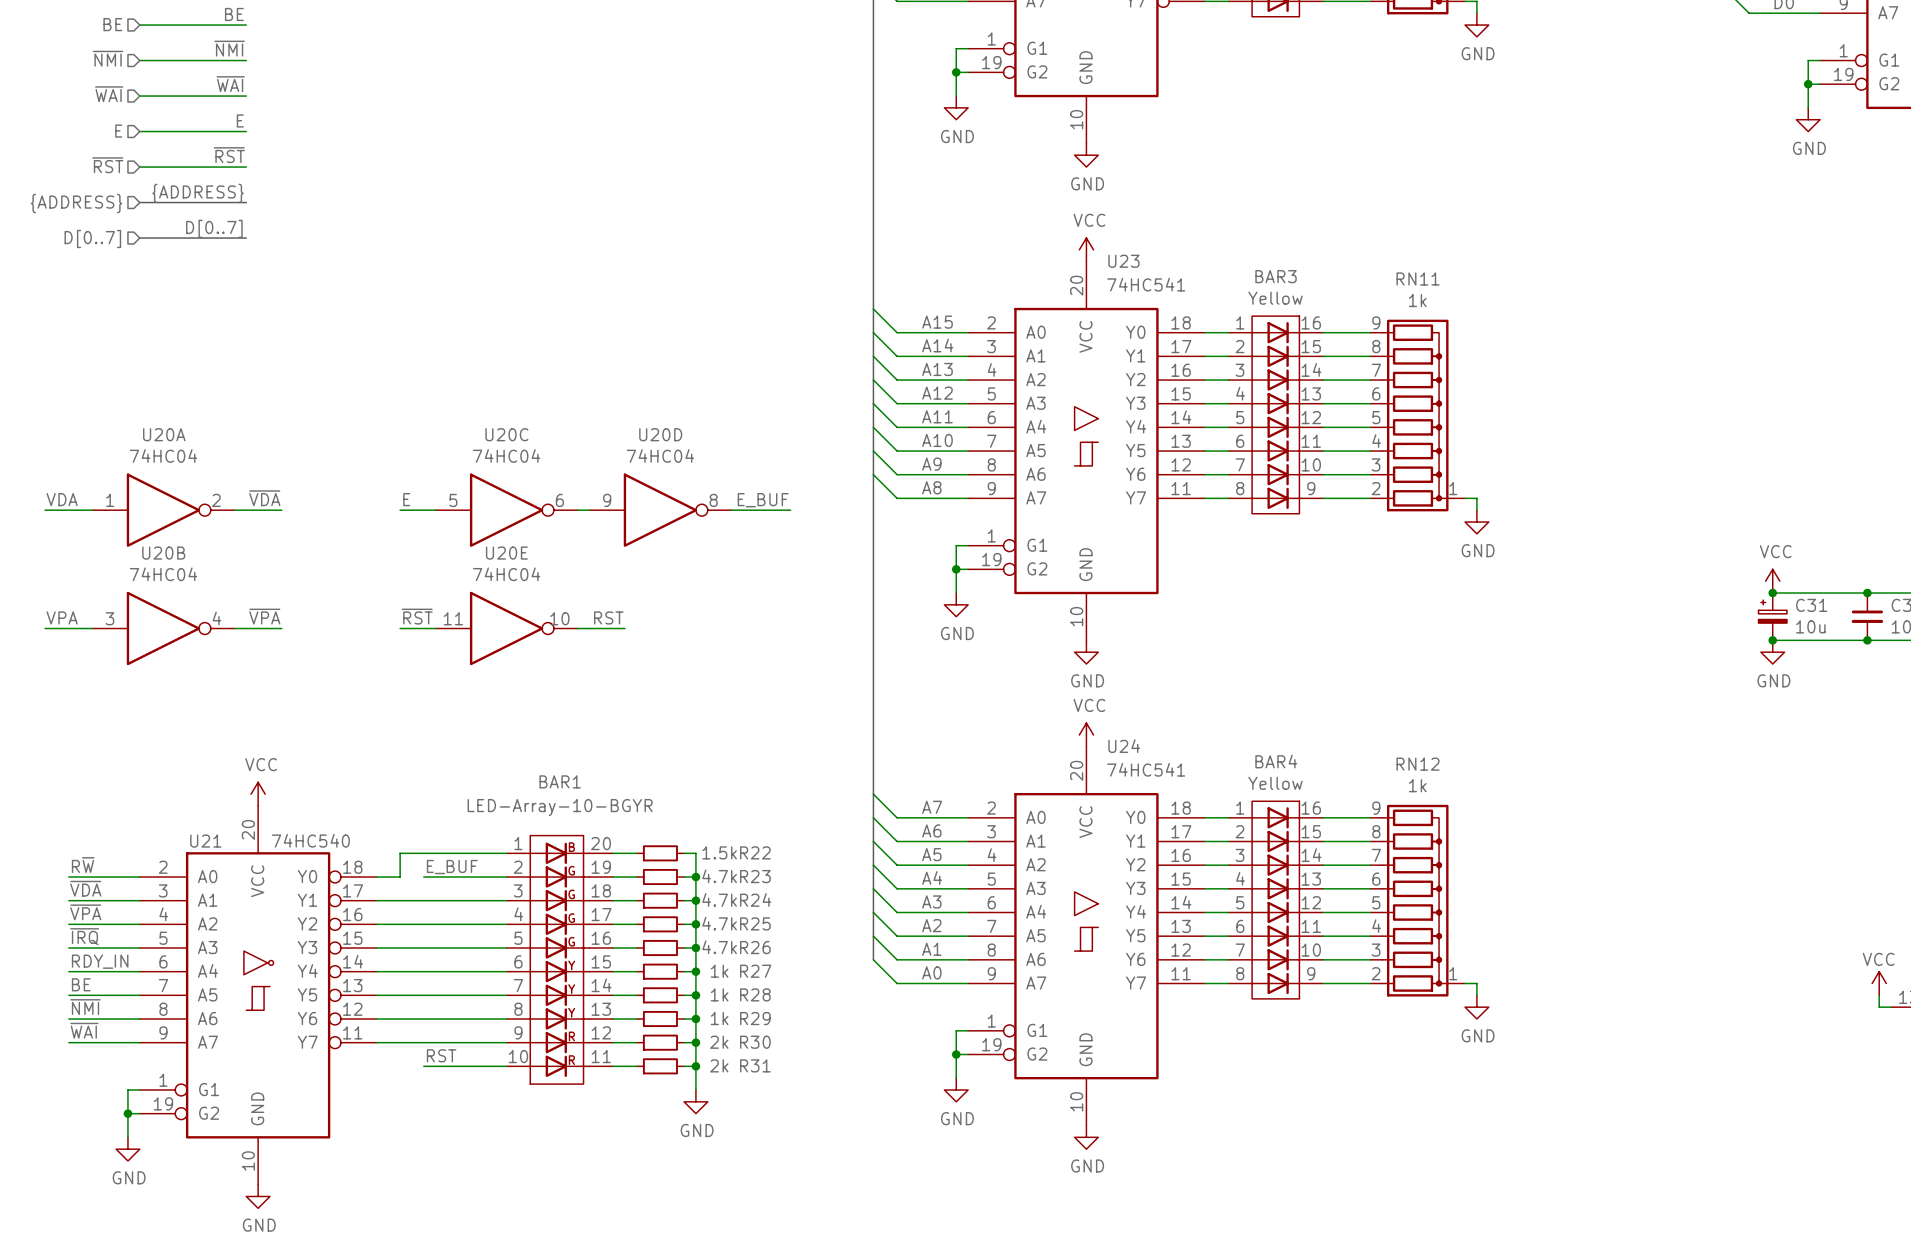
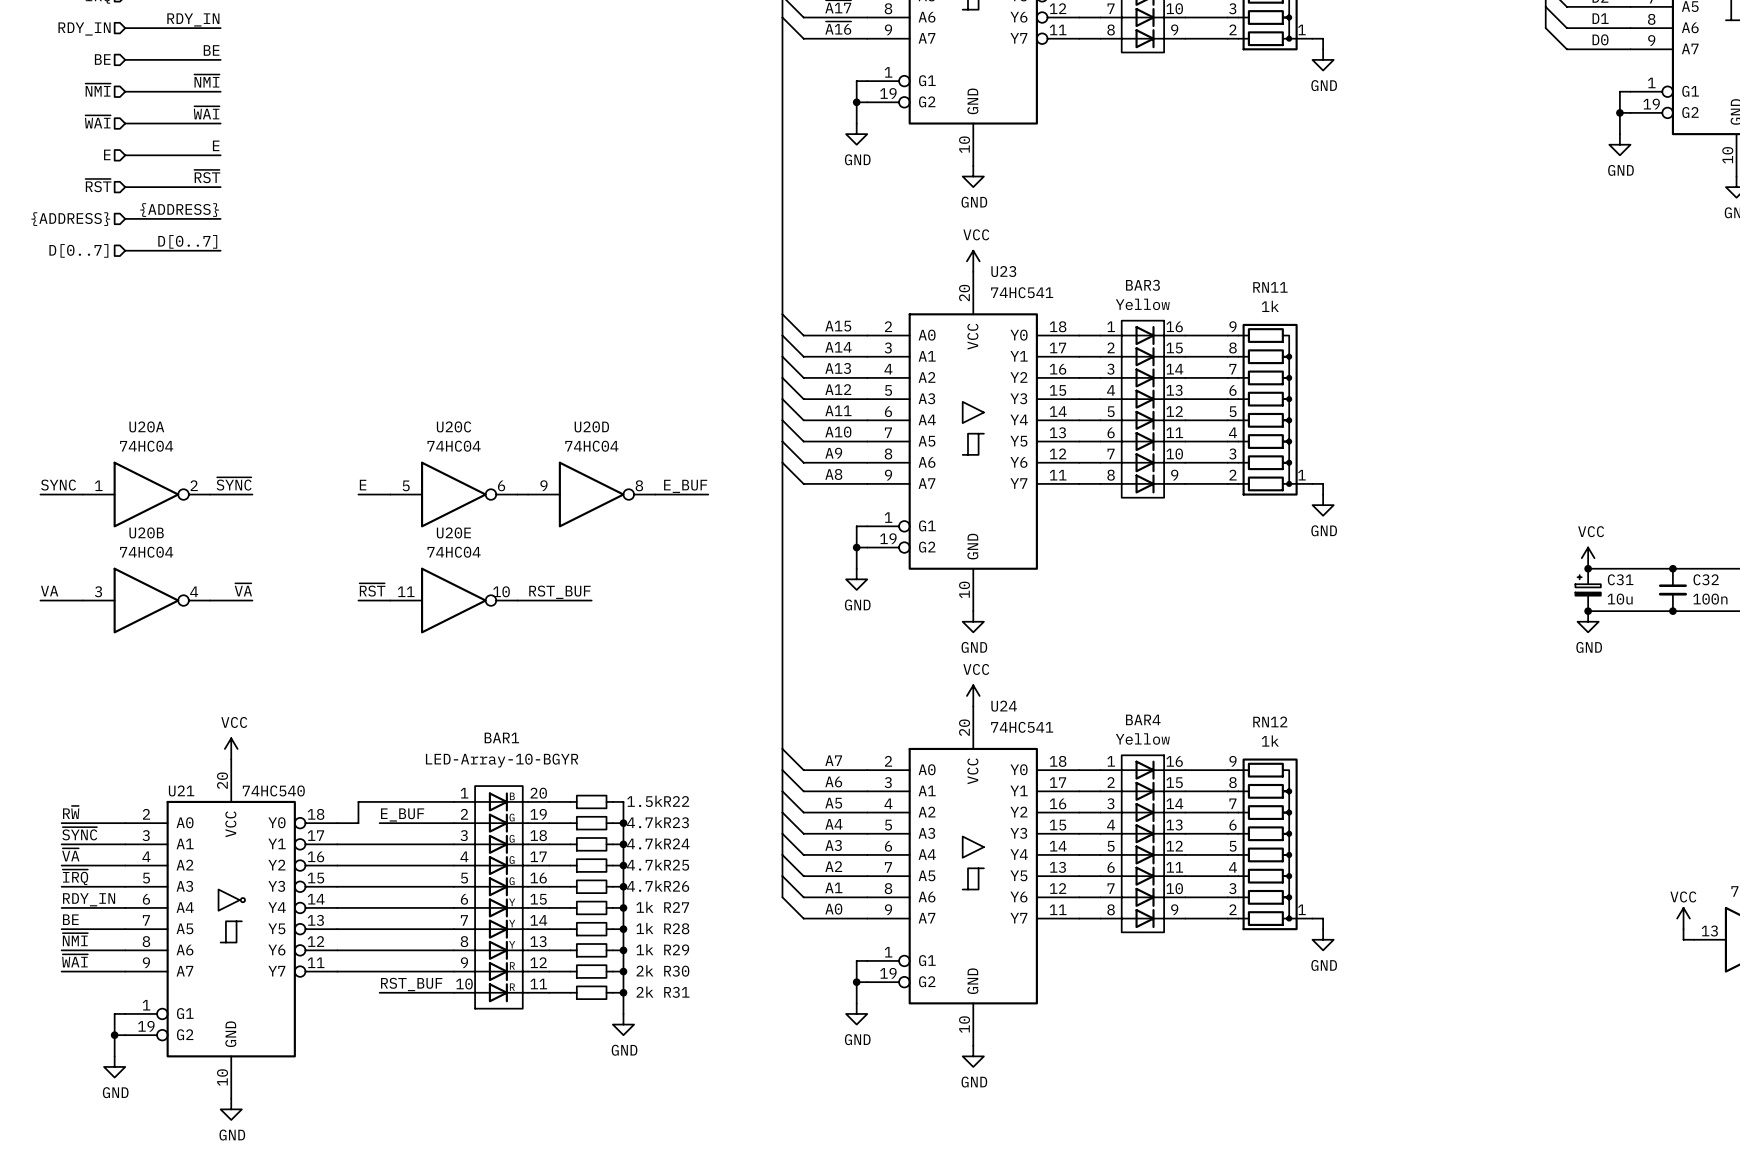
label: ~{VDA} (264, 498) -> ~{SYNC} (234, 483)
label: VDA (62, 499) -> SYNC (58, 485)
label: ~{VPA} (264, 616) -> ~{VA} (243, 589)
label: VPA (62, 617) -> VA (49, 591)
label: RST (608, 617) -> none
label: none -> RST_BUF (559, 592)
wire: none -> (559, 600) (591, 600)
label: ~{VDA} (85, 888) -> ~{SYNC} (79, 833)
label: ~{VPA} (85, 912) -> ~{VA} (70, 854)
label: RST (441, 1055) -> RST_BUF (411, 984)

